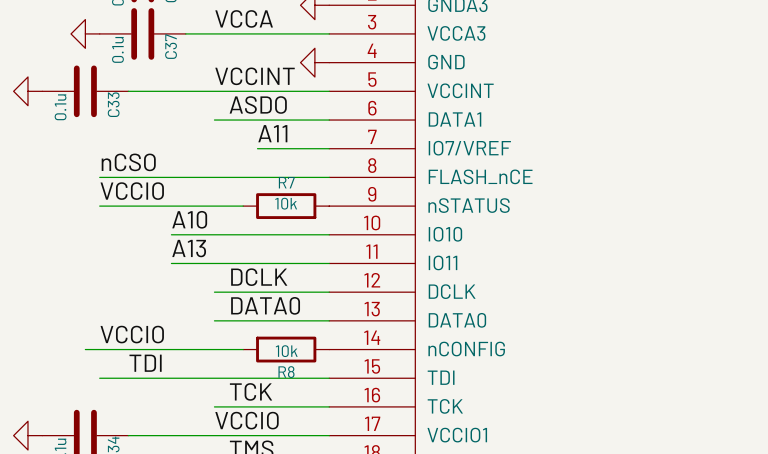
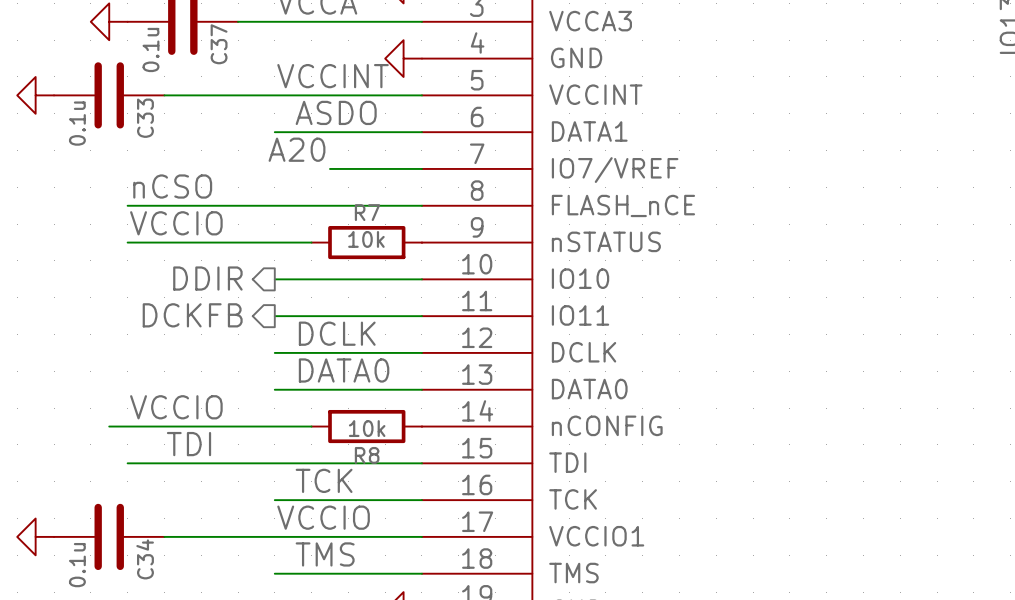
label: A11 (272, 133) -> A20 (297, 149)
label: A10 (189, 219) -> none
hierarchical label: none -> DDIR (207, 278)
wire: (171, 234) (214, 234) -> none
label: A13 (189, 248) -> none
hierarchical label: none -> DCKFB (192, 315)
wire: (171, 263) (214, 263) -> none

